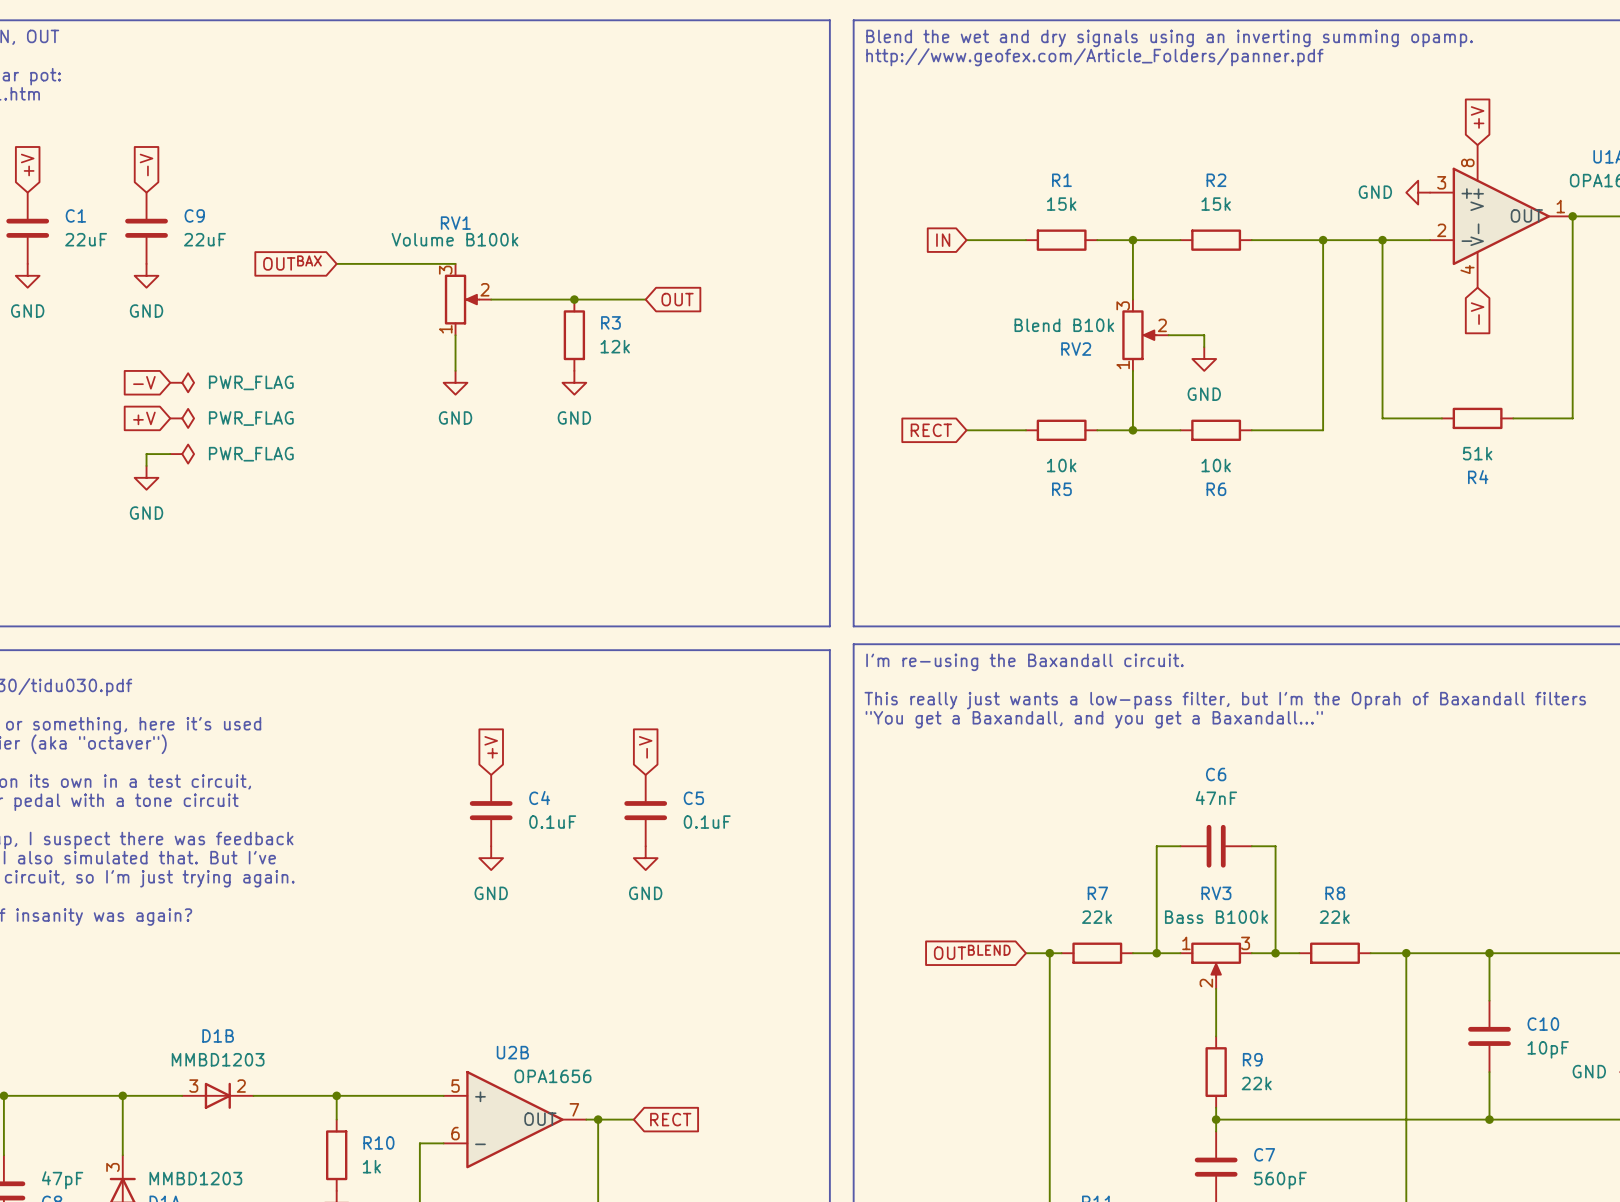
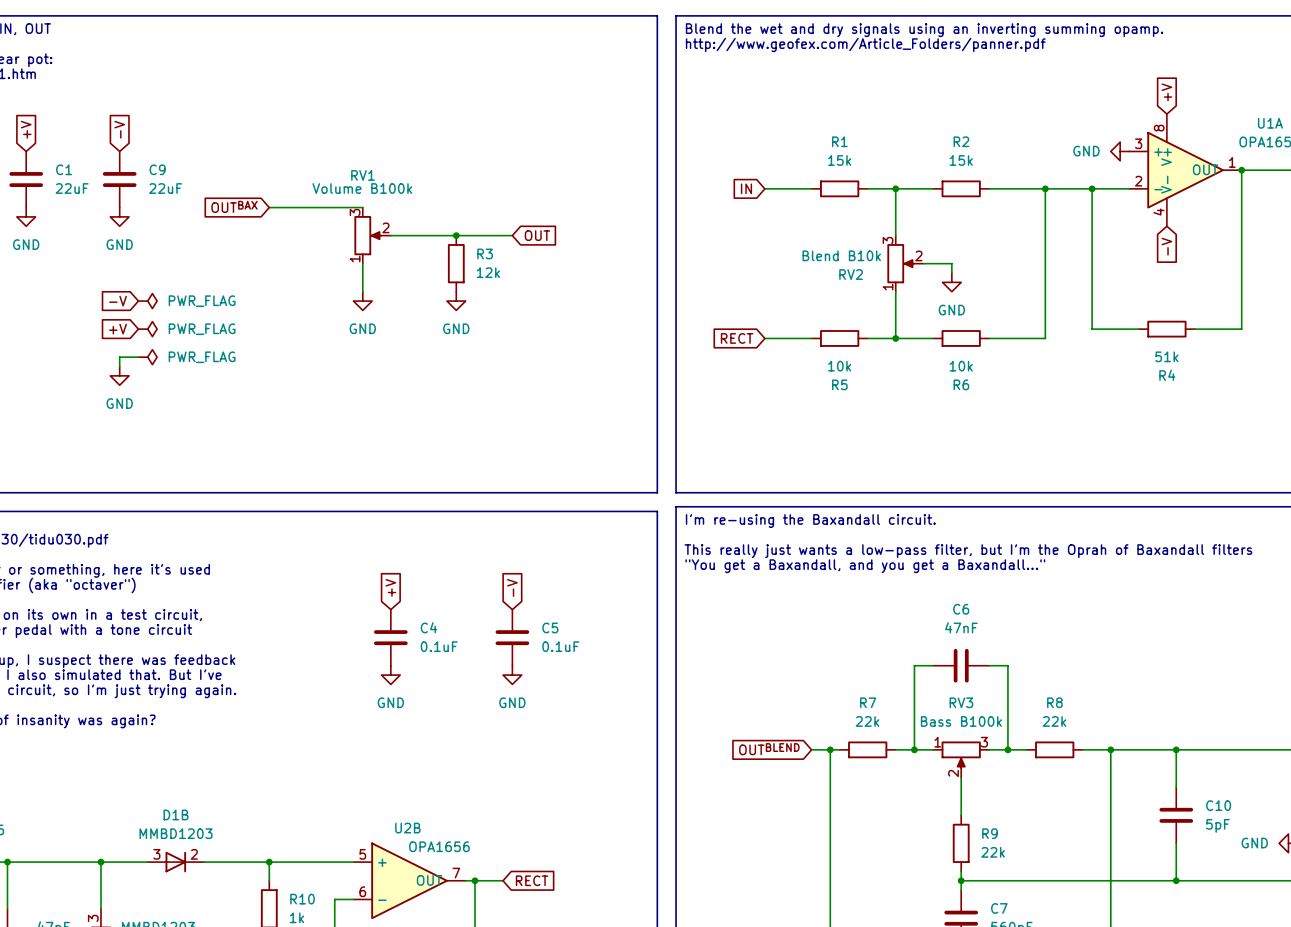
C10 value: 10pF (1548, 1049) -> 5pF (1217, 825)

